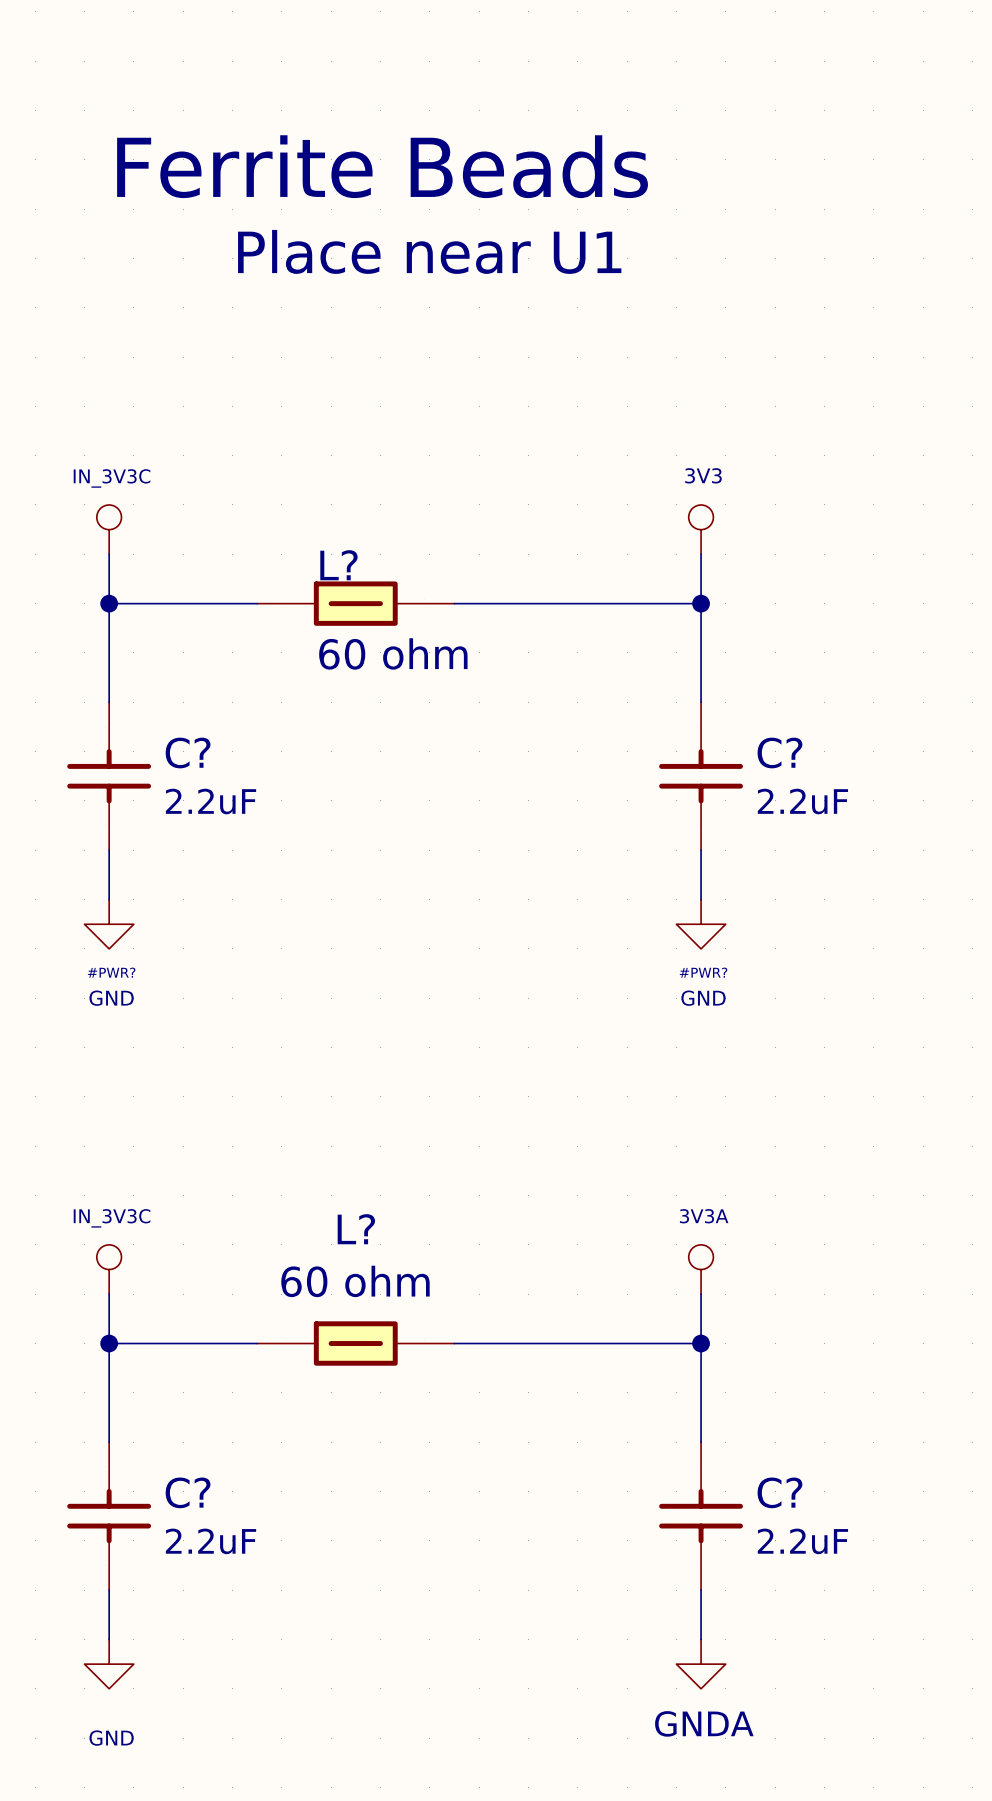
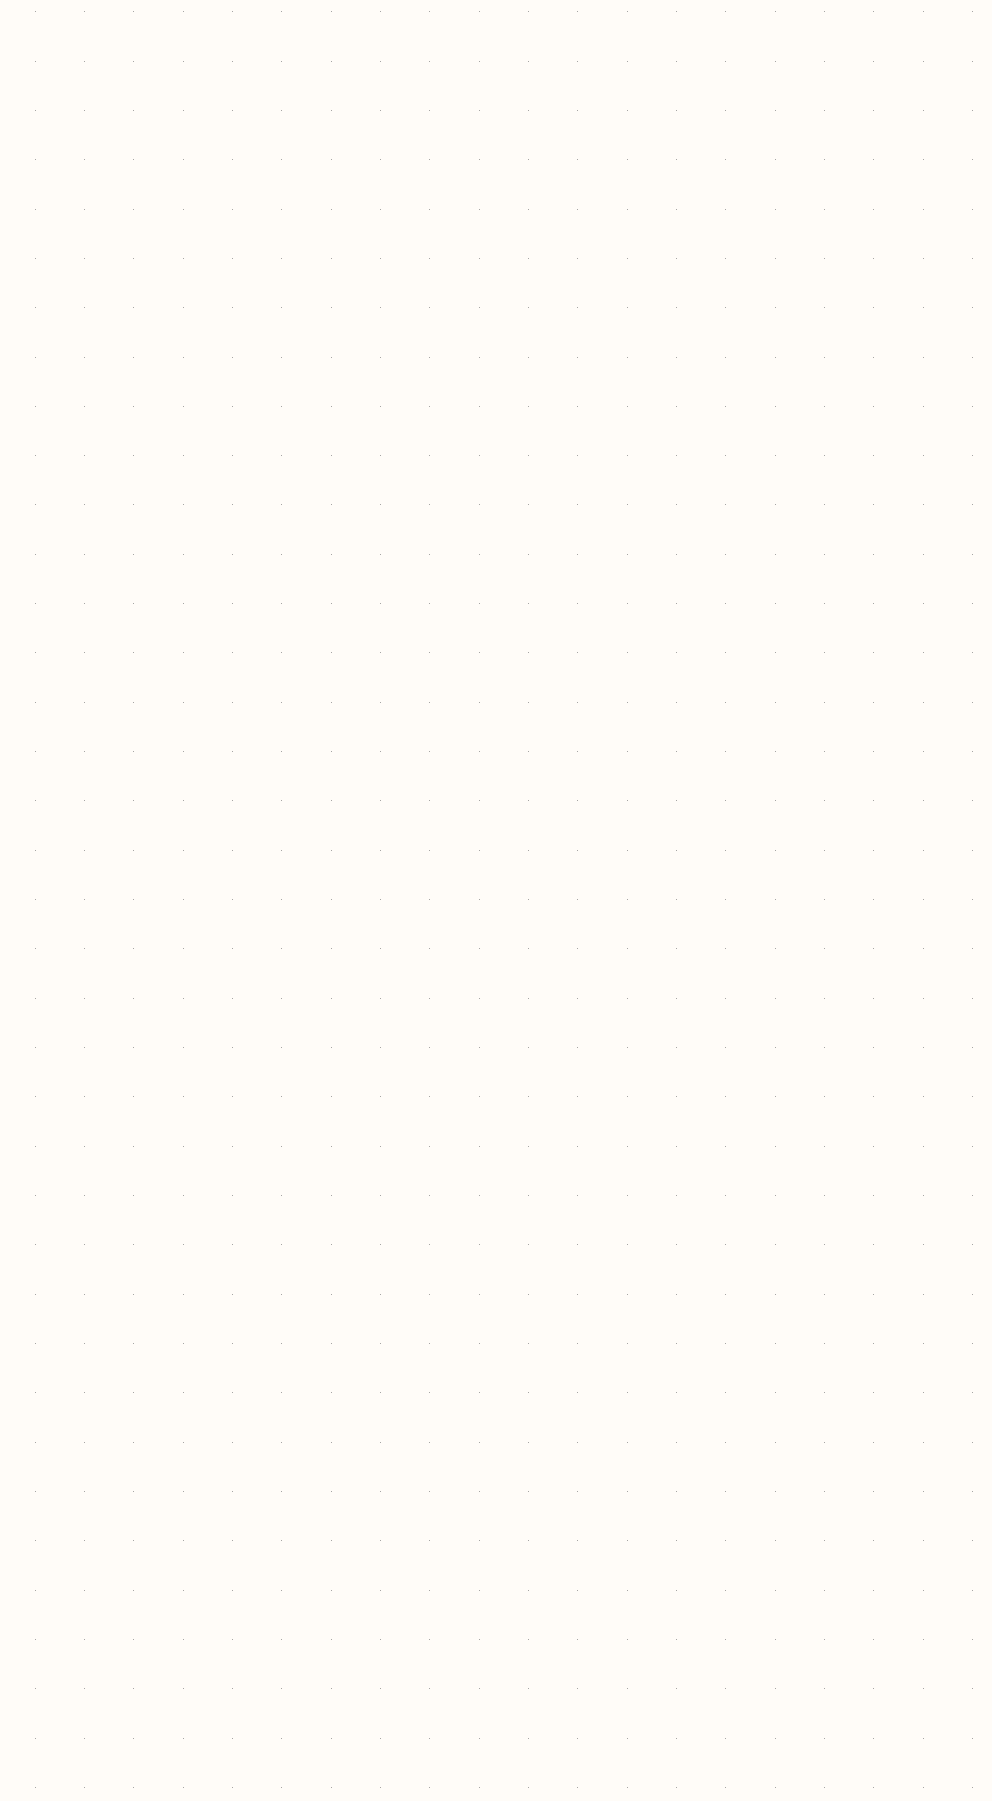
text: Ferrite Beads (382, 166) -> none
text: Place near U1 (429, 251) -> none
power symbol: IN_3V3C (109, 529) -> none
power symbol: 3V3 (701, 529) -> none
wire: (109, 554) (109, 702) -> none
wire: (701, 554) (701, 702) -> none
wire: (109, 603) (257, 603) -> none
junction: (109, 603) -> none
L?: 60 ohm (355, 603) -> none
wire: (454, 603) (701, 603) -> none
junction: (701, 603) -> none
C?: 2.2uF (109, 776) -> none
C?: 2.2uF (701, 776) -> none
wire: (109, 850) (109, 899) -> none
wire: (701, 850) (701, 899) -> none
#PWR?: GND (109, 924) -> none
#PWR?: GND (701, 924) -> none
power symbol: IN_3V3C (109, 1269) -> none
power symbol: 3V3A (701, 1269) -> none
wire: (109, 1294) (109, 1442) -> none
wire: (701, 1294) (701, 1442) -> none
wire: (109, 1343) (257, 1343) -> none
junction: (109, 1343) -> none
L?: 60 ohm (355, 1343) -> none
wire: (454, 1343) (701, 1343) -> none
junction: (701, 1343) -> none
C?: 2.2uF (109, 1516) -> none
C?: 2.2uF (701, 1516) -> none
wire: (109, 1590) (109, 1639) -> none
wire: (701, 1590) (701, 1639) -> none
power symbol: GND (109, 1664) -> none
power symbol: GNDA (701, 1664) -> none

